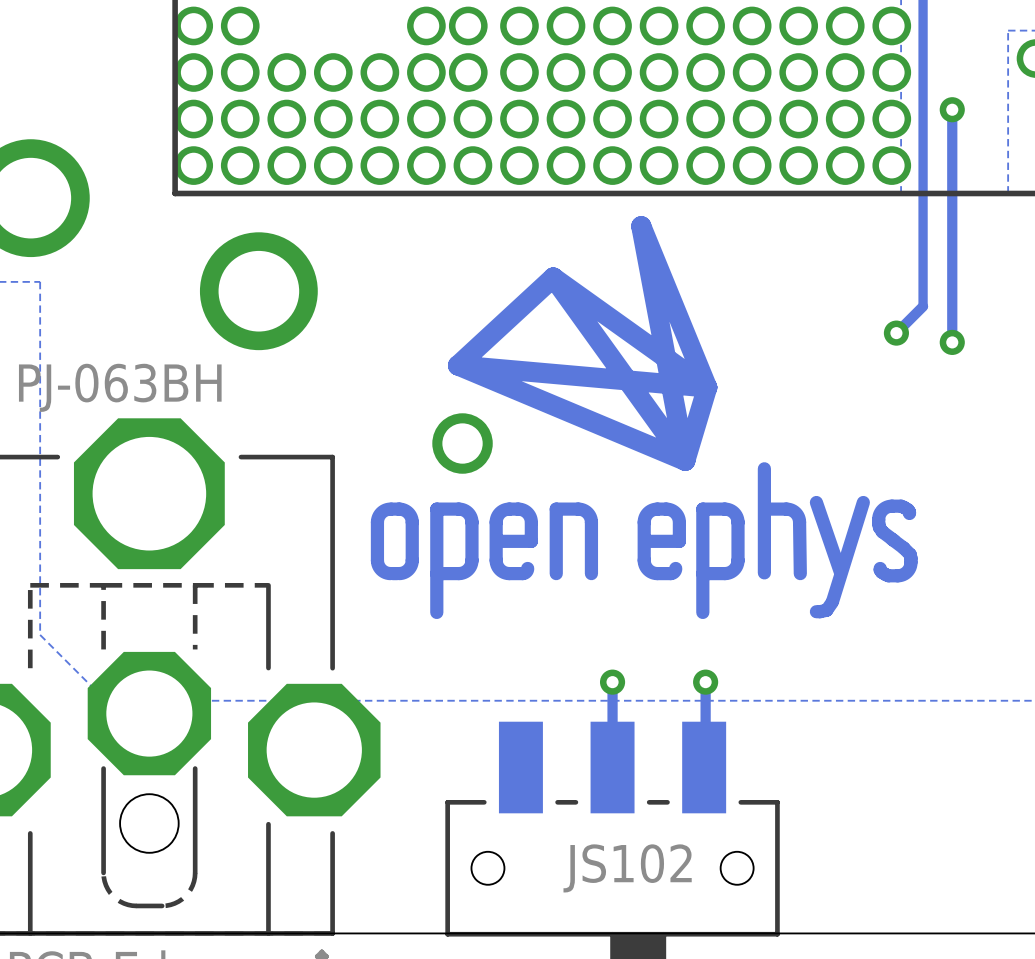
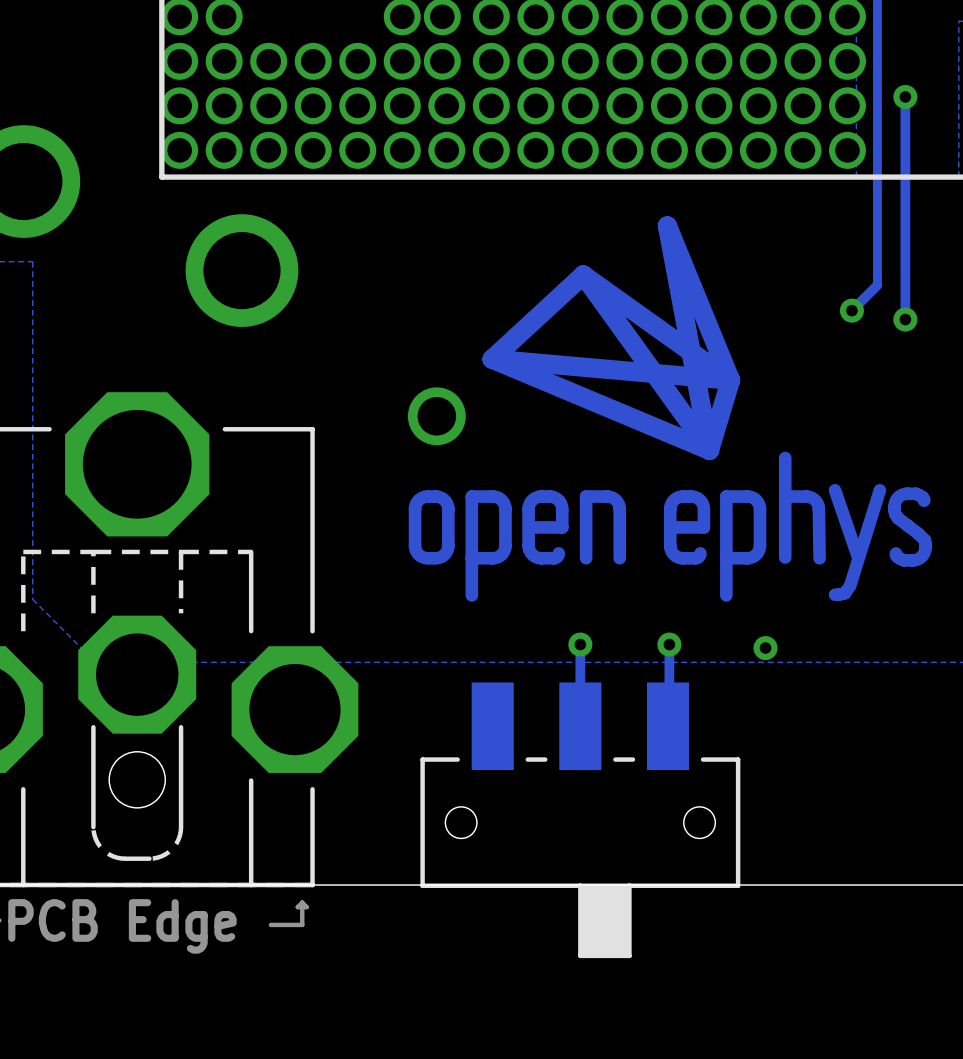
part value: PJ-063BH (120, 387) -> none
drawing position: (644, 417) -> (670, 409)
via: none -> (765, 648)
part value: JS102 (627, 868) -> none

